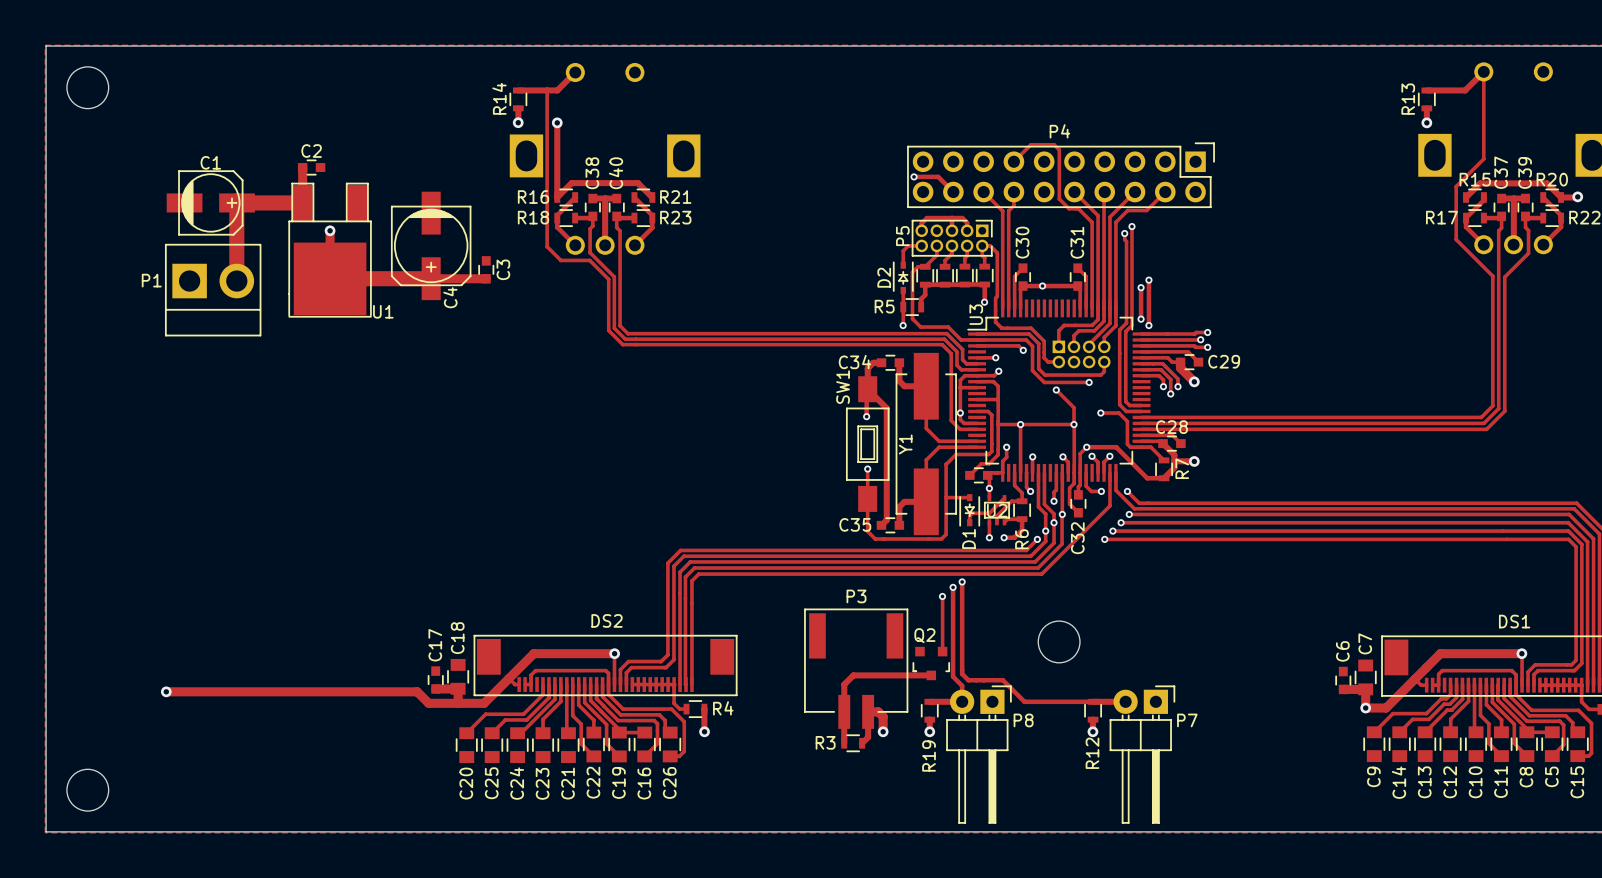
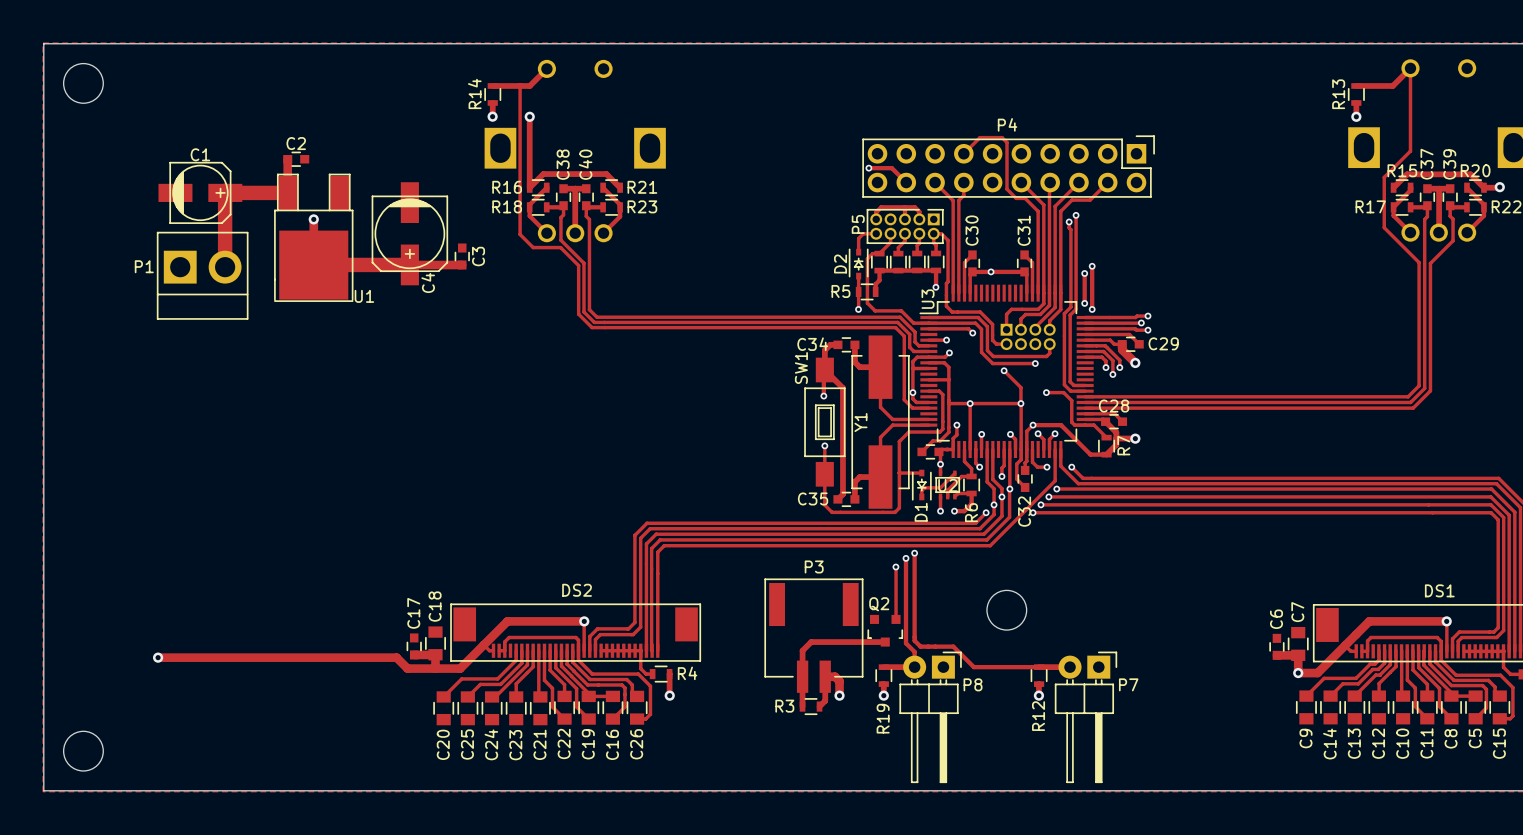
track: none -> (1056, 489) (1073, 489)
via: none -> (1056, 489)
via: (1129, 514) -> none
track: none -> (1048, 496) (1065, 496)
via: none -> (1048, 496)
via: (1121, 522) -> none
track: none -> (1040, 504) (1057, 504)
via: none -> (1040, 504)
via: (1112, 531) -> none
track: none -> (1033, 512) (1050, 512)
via: none -> (1033, 512)
via: (1104, 539) -> none

